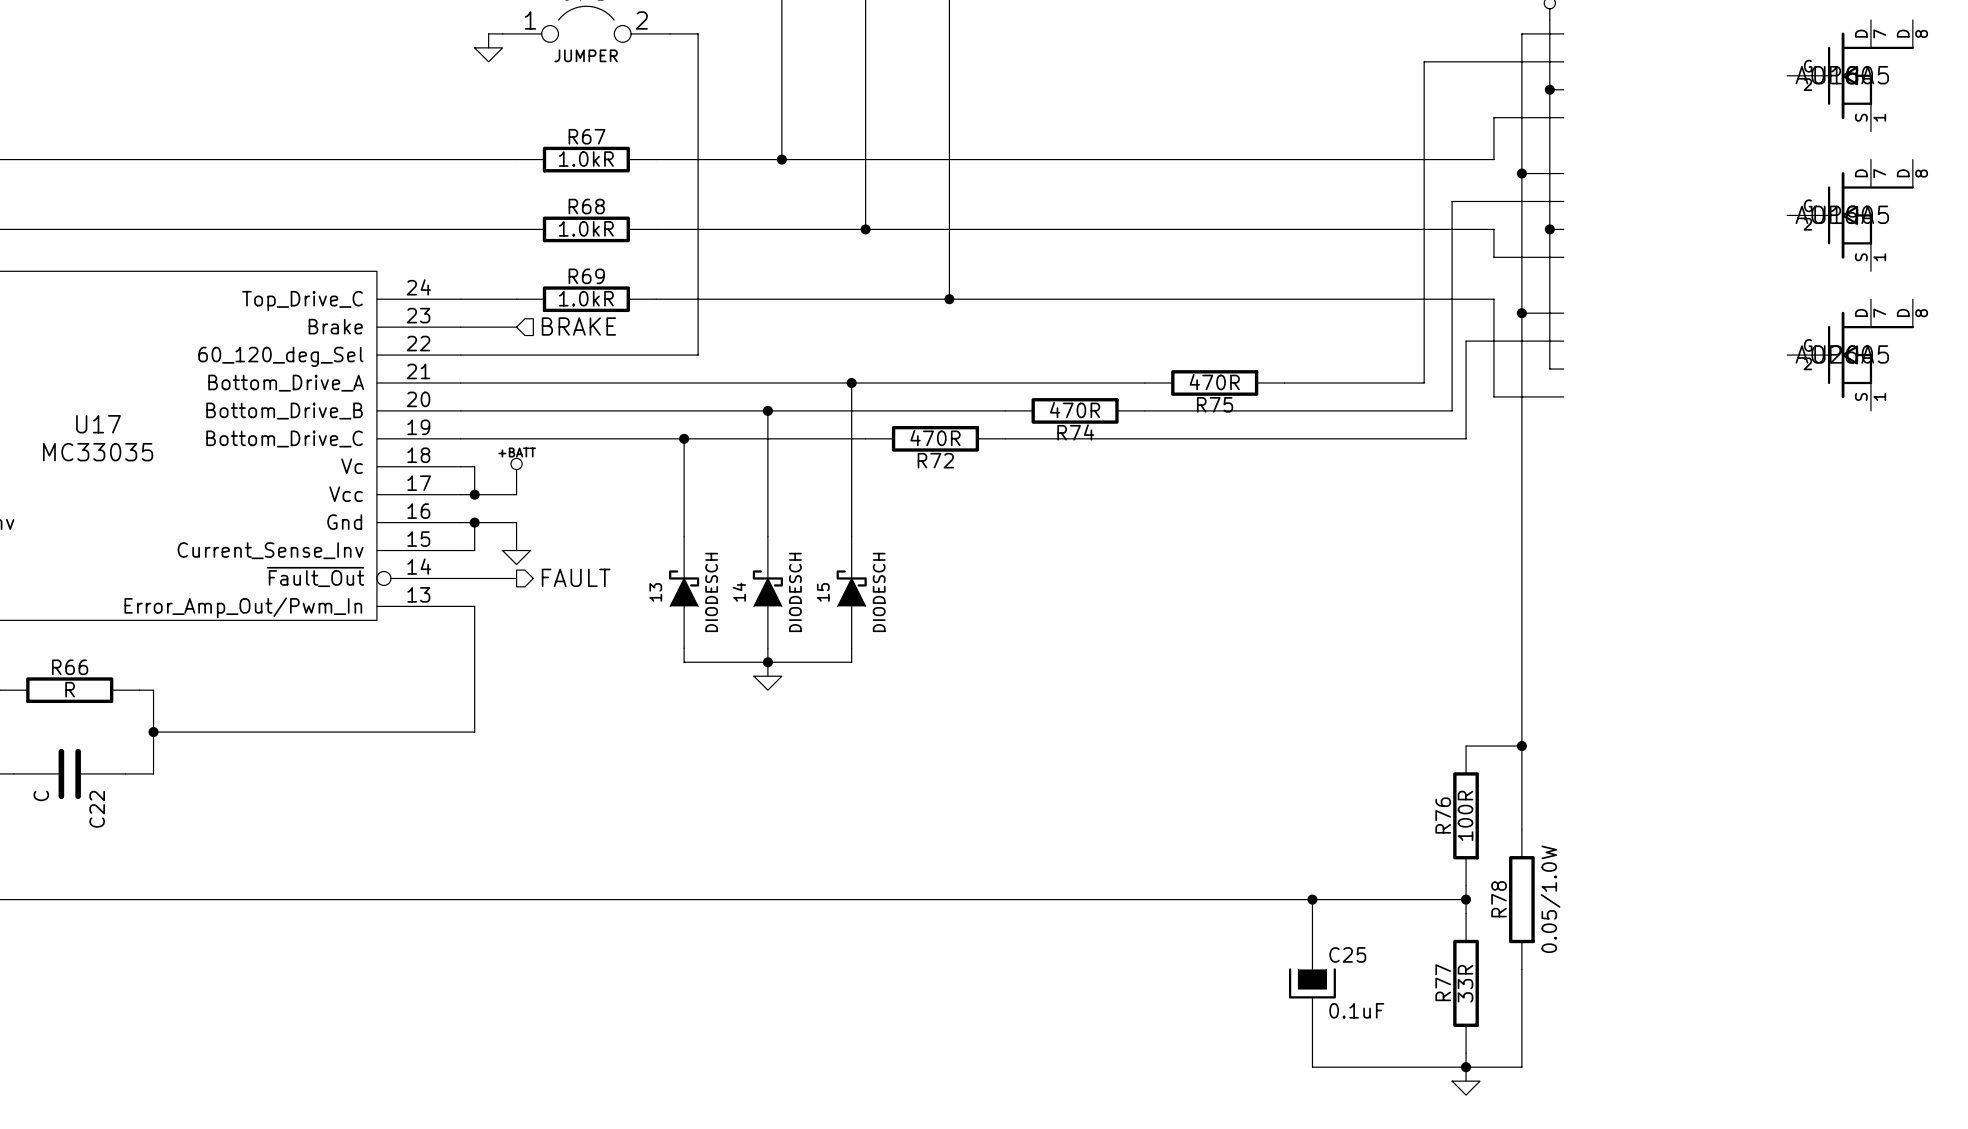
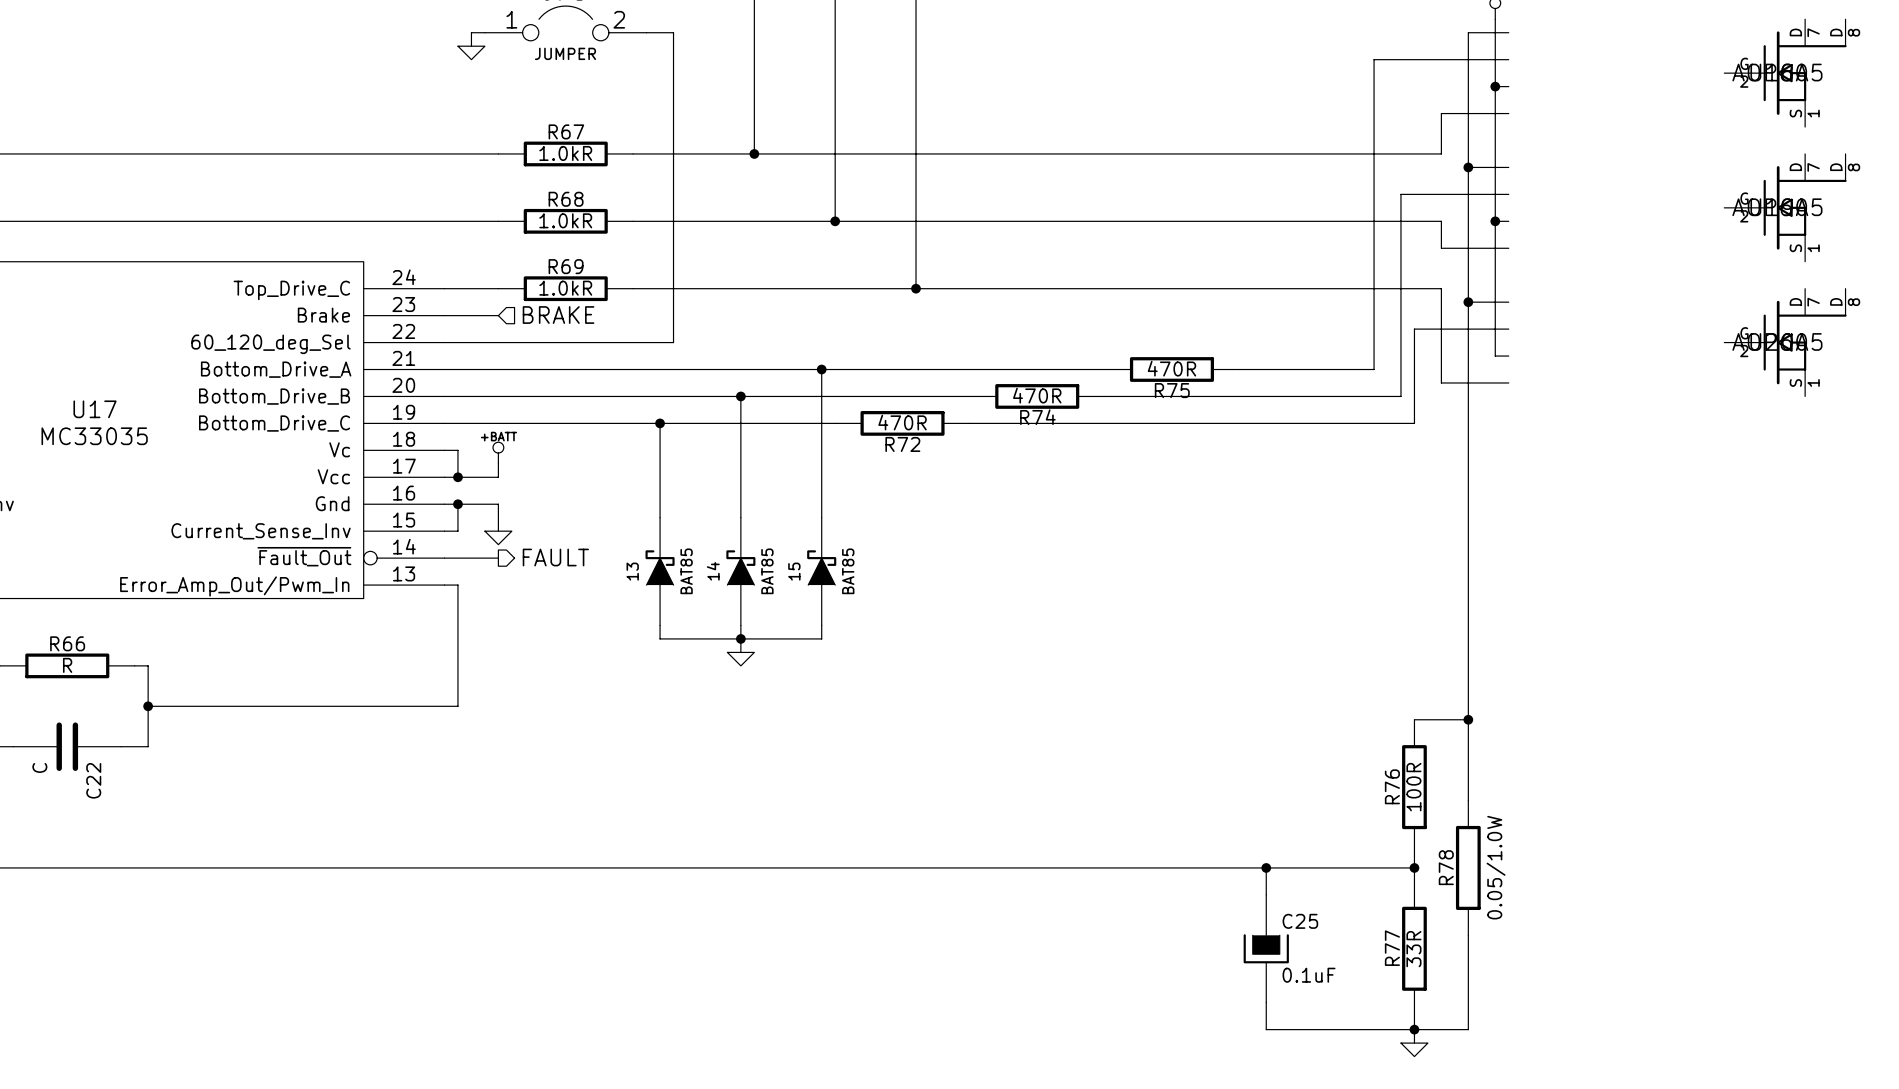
13 value: DIODESCH (711, 592) -> BAT85 (686, 571)
14 value: DIODESCH (795, 592) -> BAT85 (767, 571)
15 value: DIODESCH (879, 592) -> BAT85 (848, 571)

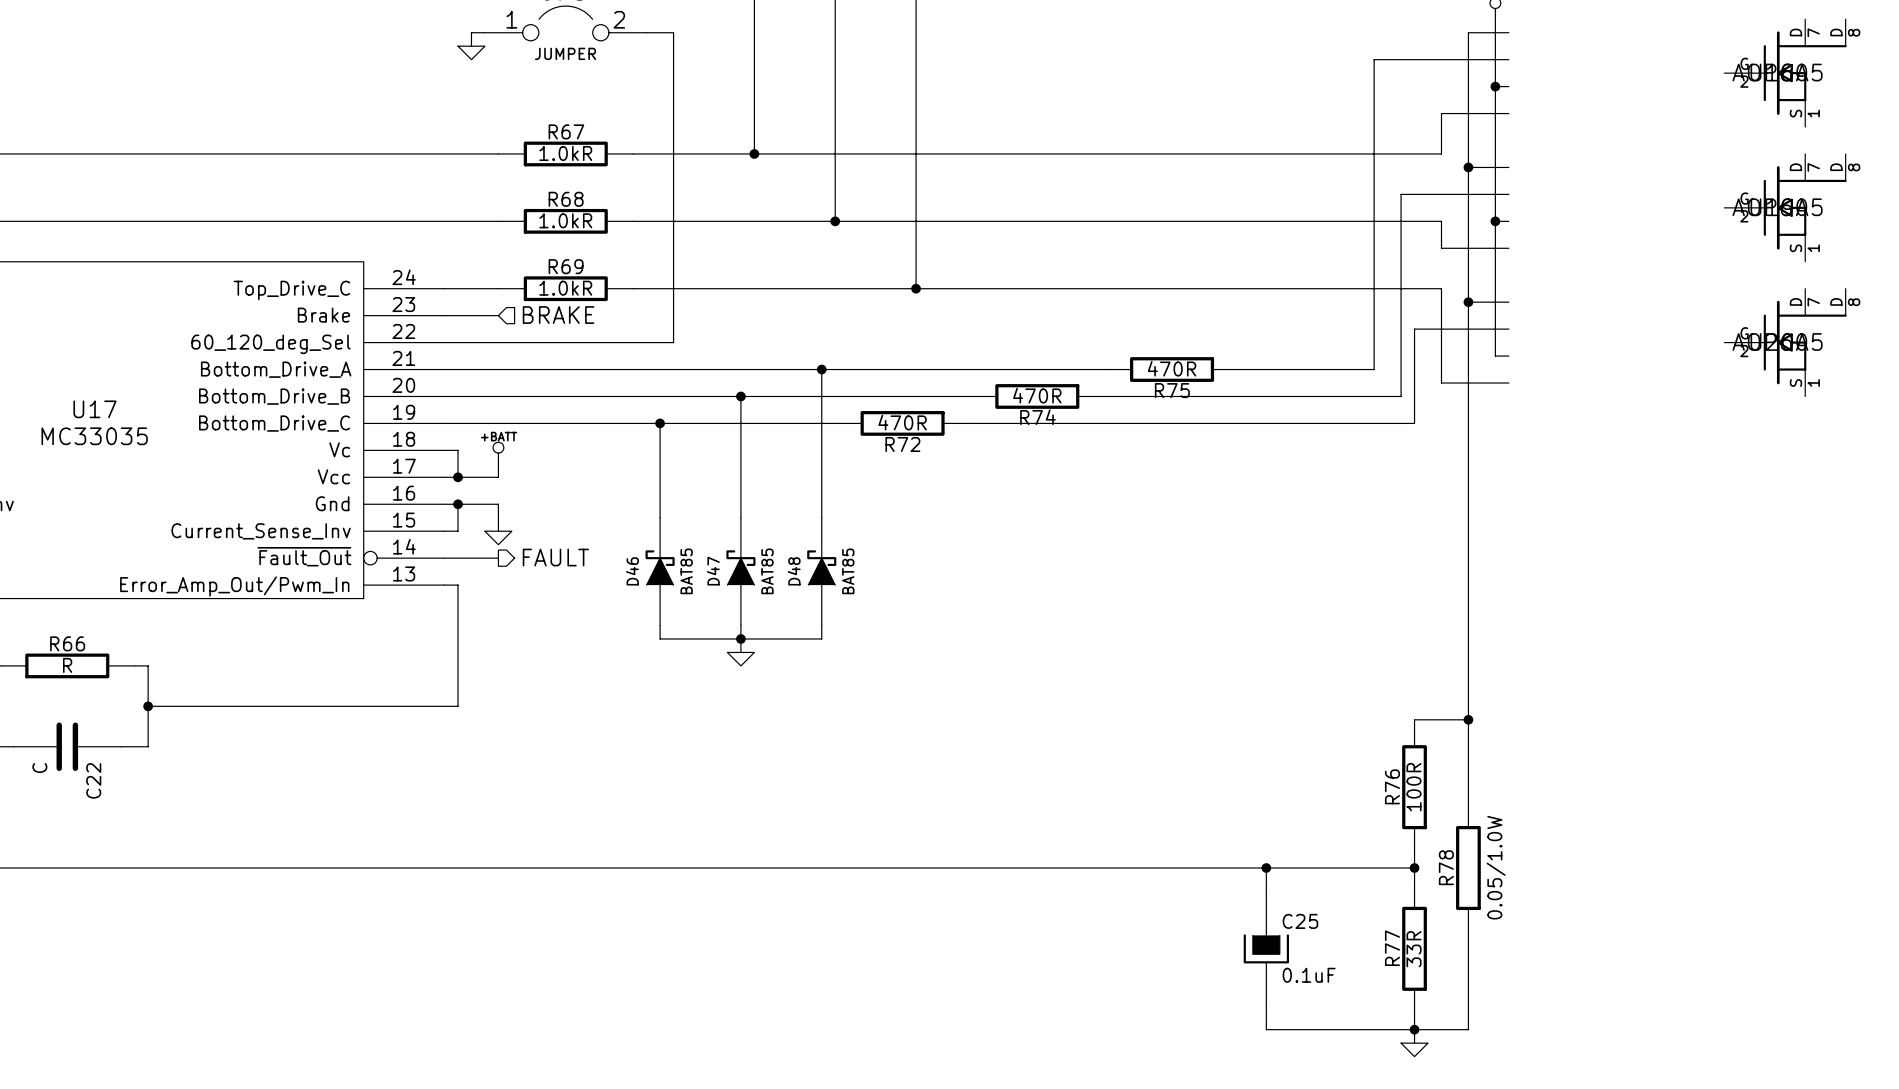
13 name: 13 (632, 571) -> D46 (632, 571)
14 name: 14 (713, 571) -> D47 (713, 571)
15 name: 15 (794, 571) -> D48 (794, 571)

